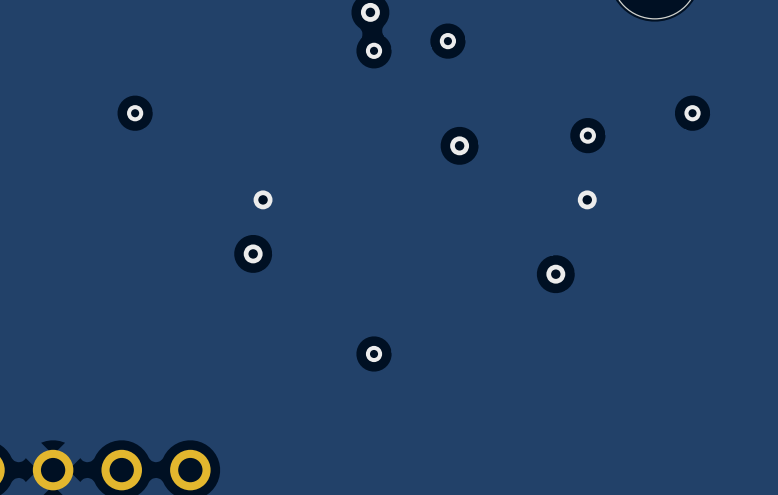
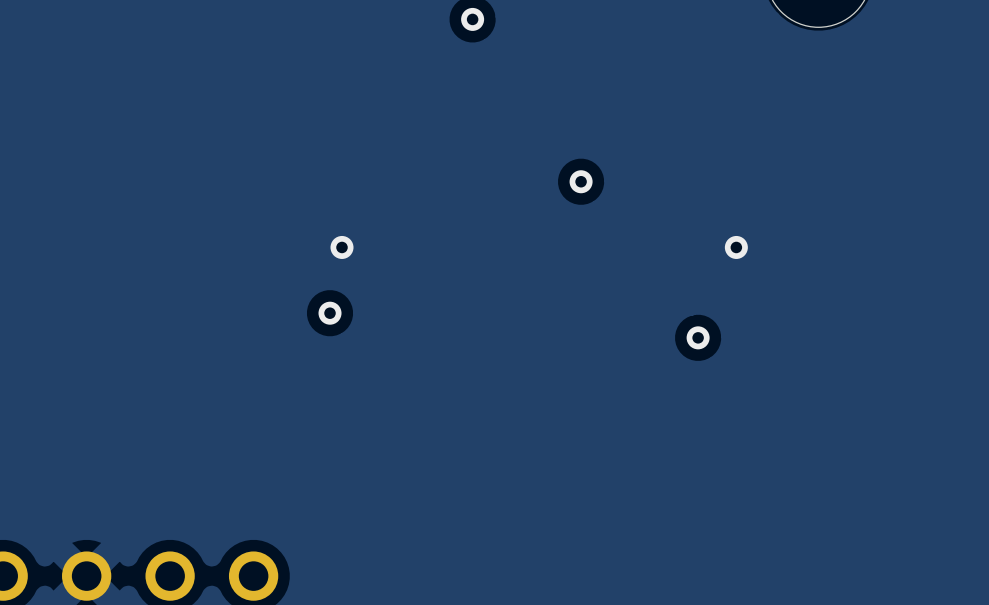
via: (447, 41) -> none
via: (374, 50) -> none
via: (135, 113) -> none
via: (692, 113) -> none
via: (587, 135) -> none
via: (374, 353) -> none

